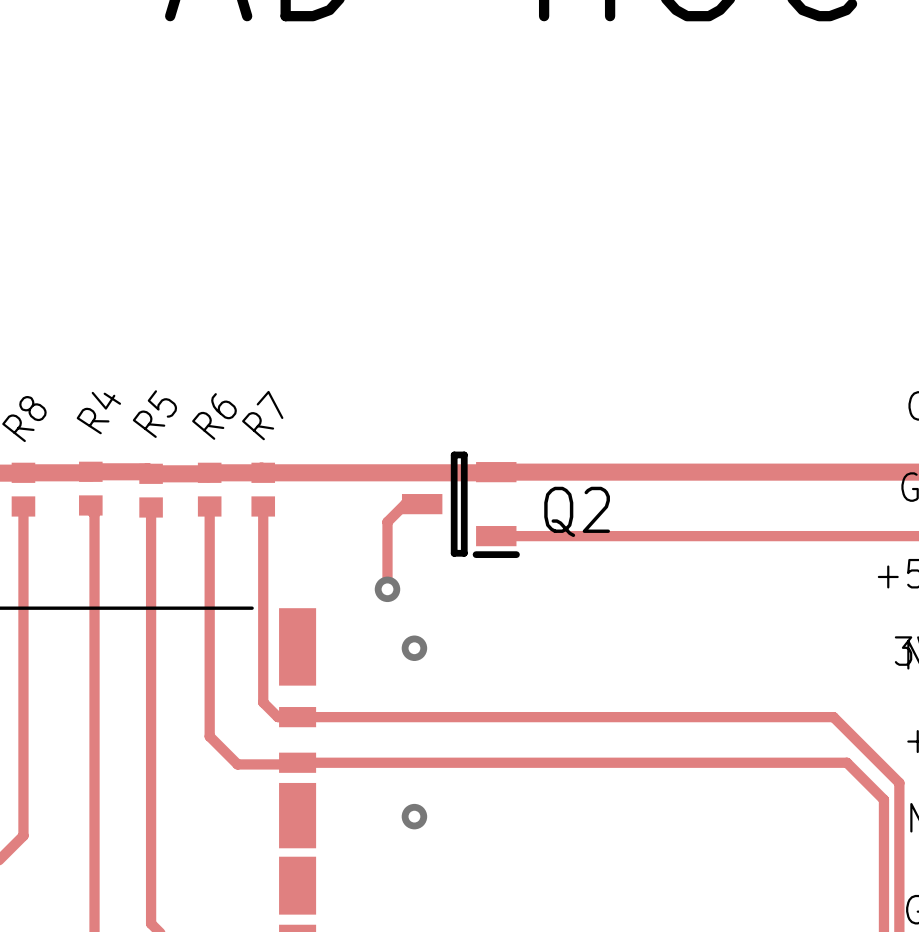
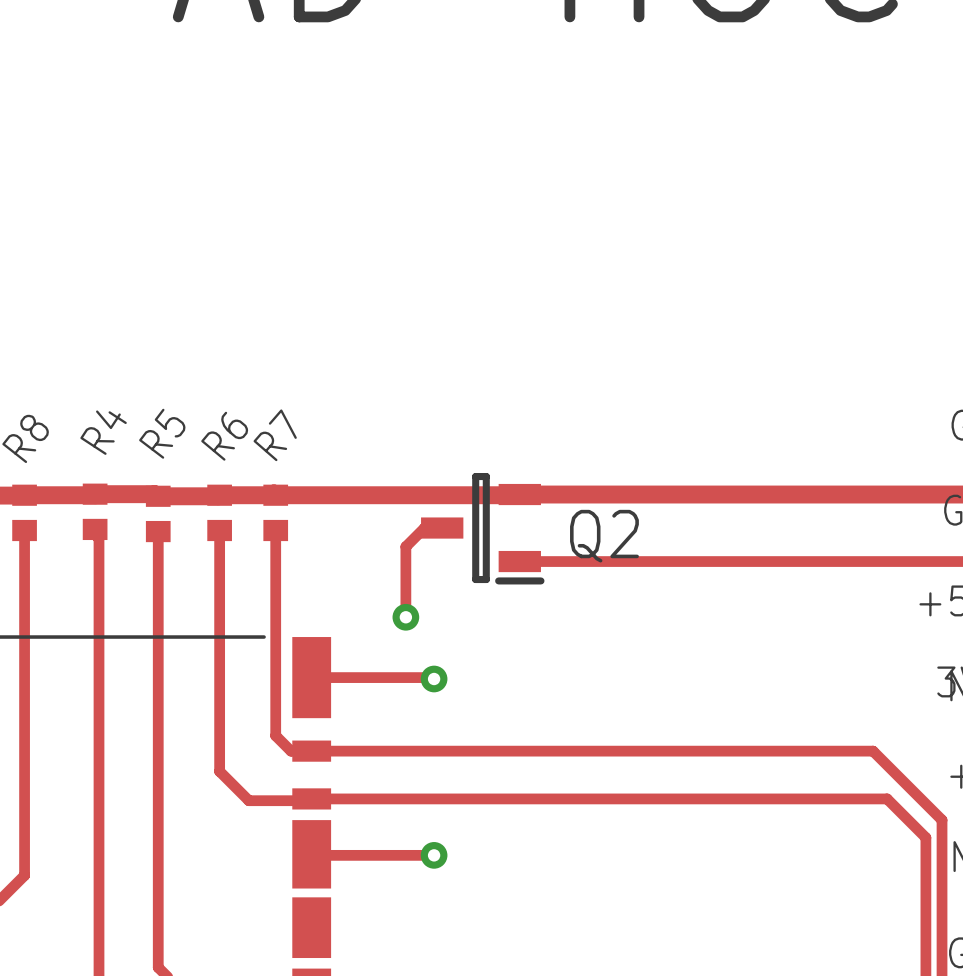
track: none -> (311, 677) (430, 679)
track: none -> (311, 854) (434, 855)

